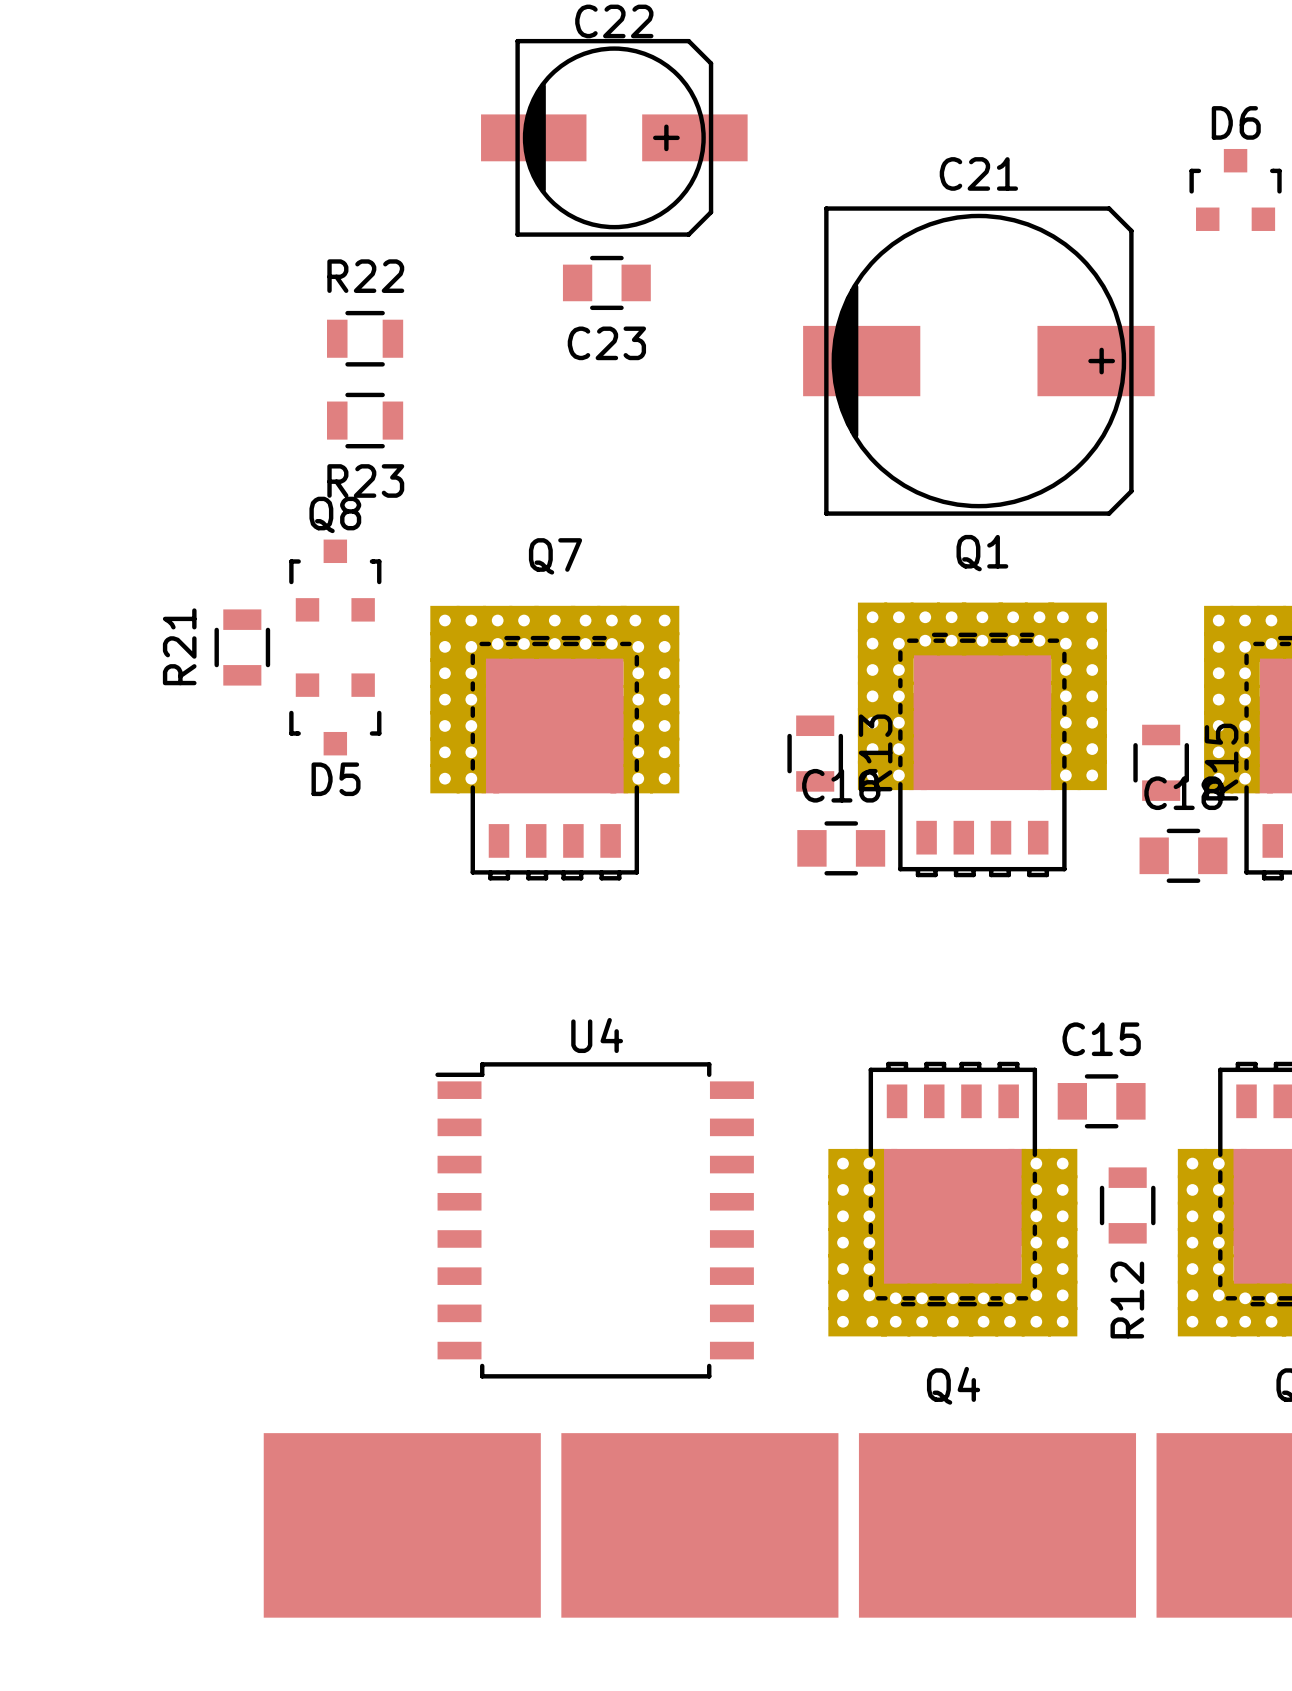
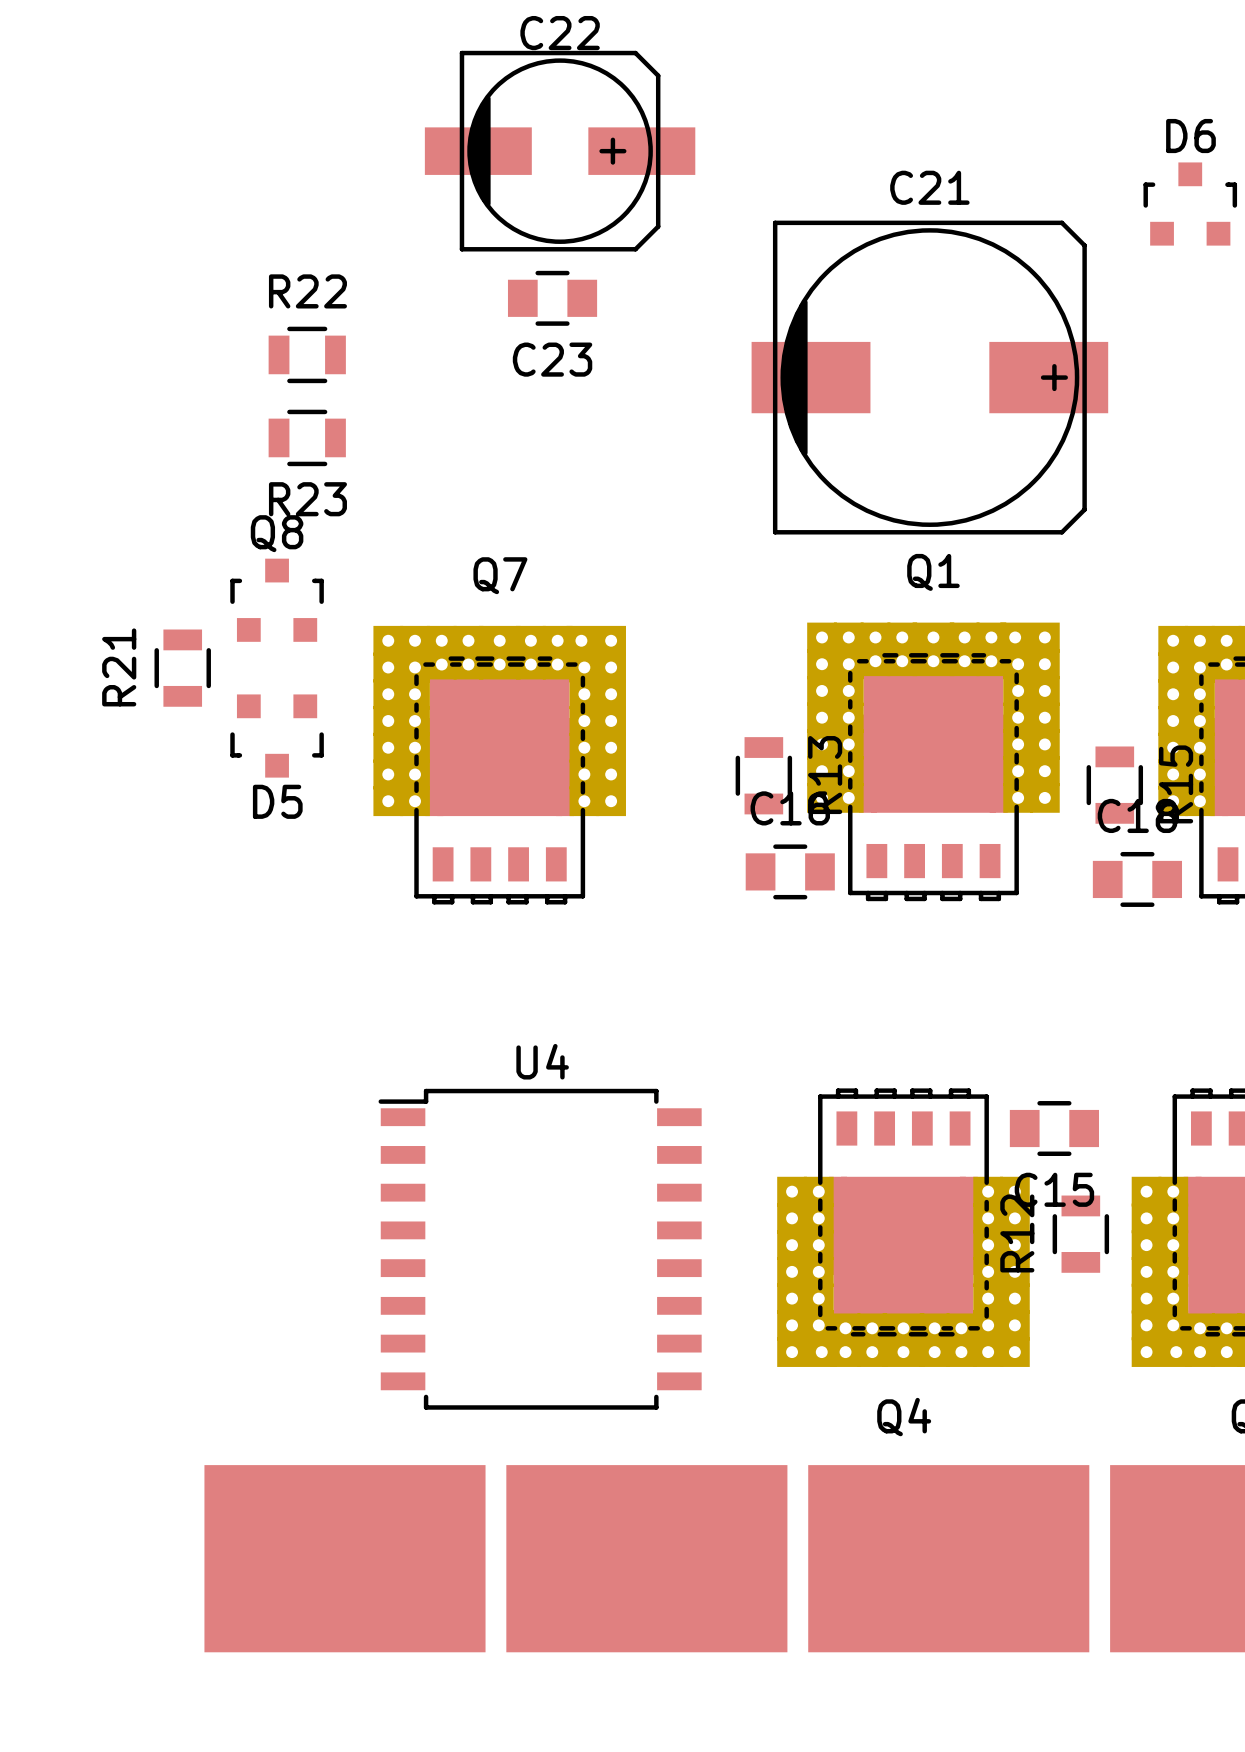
C15 name position: C15 (1101, 1039) -> C15 (1054, 1189)
R12 name position: R12 (1127, 1300) -> R12 (1017, 1233)

